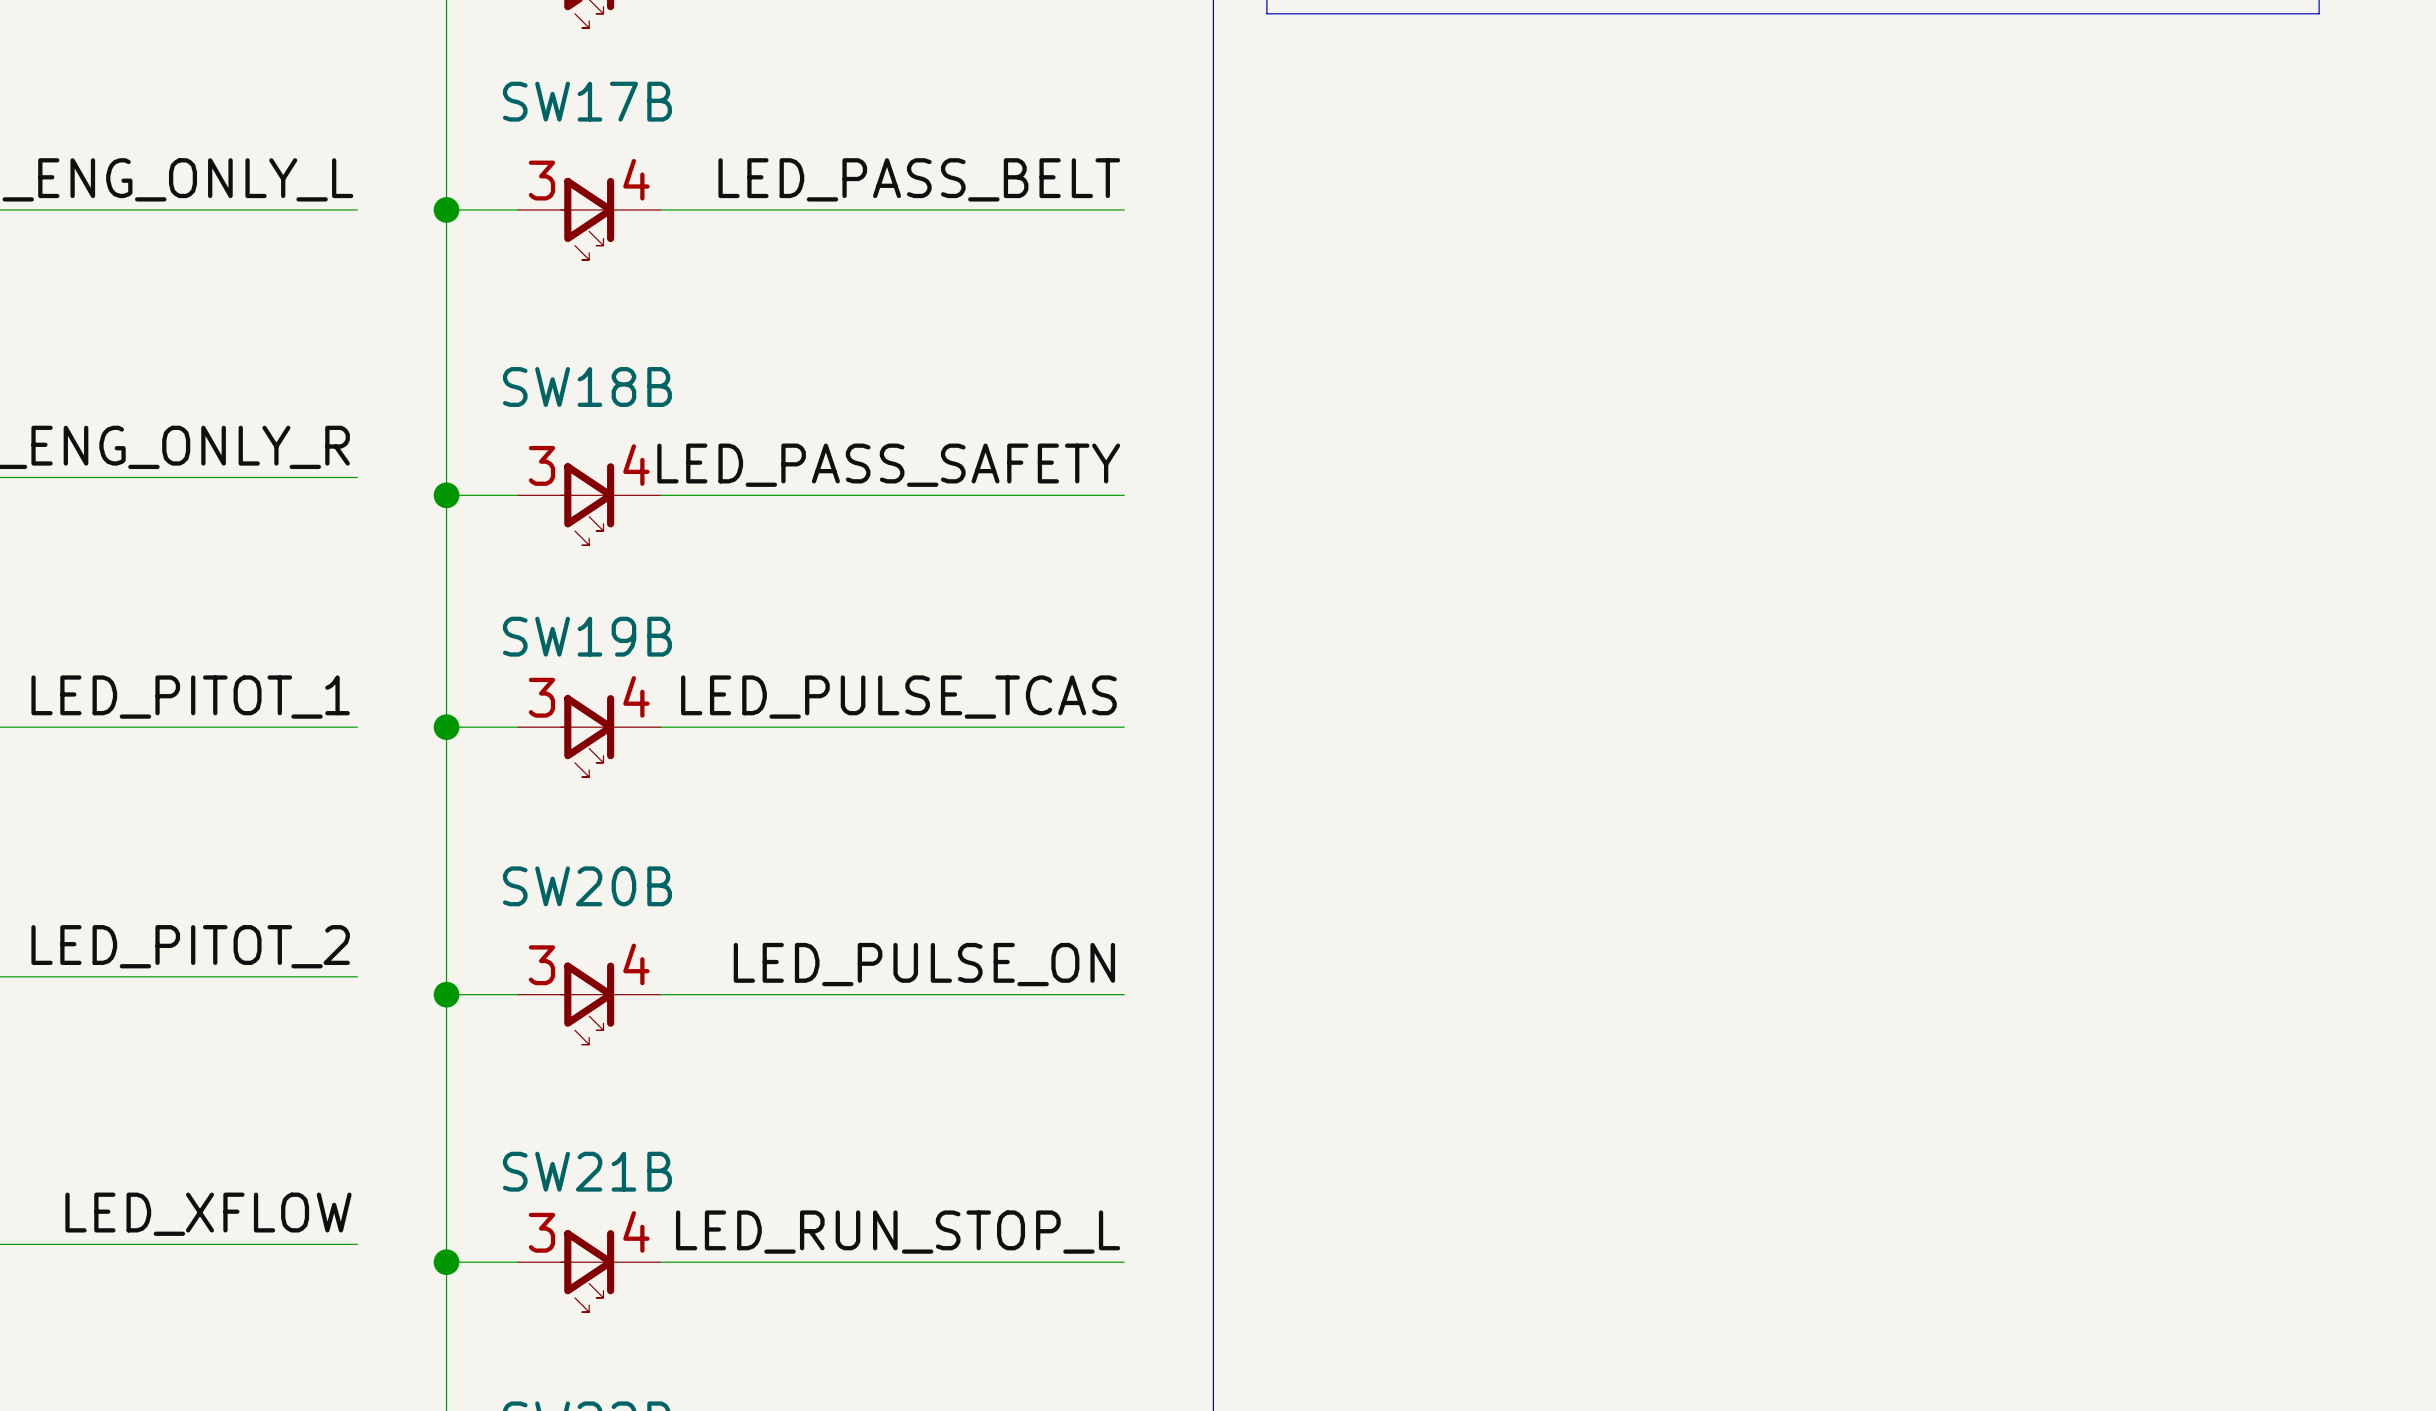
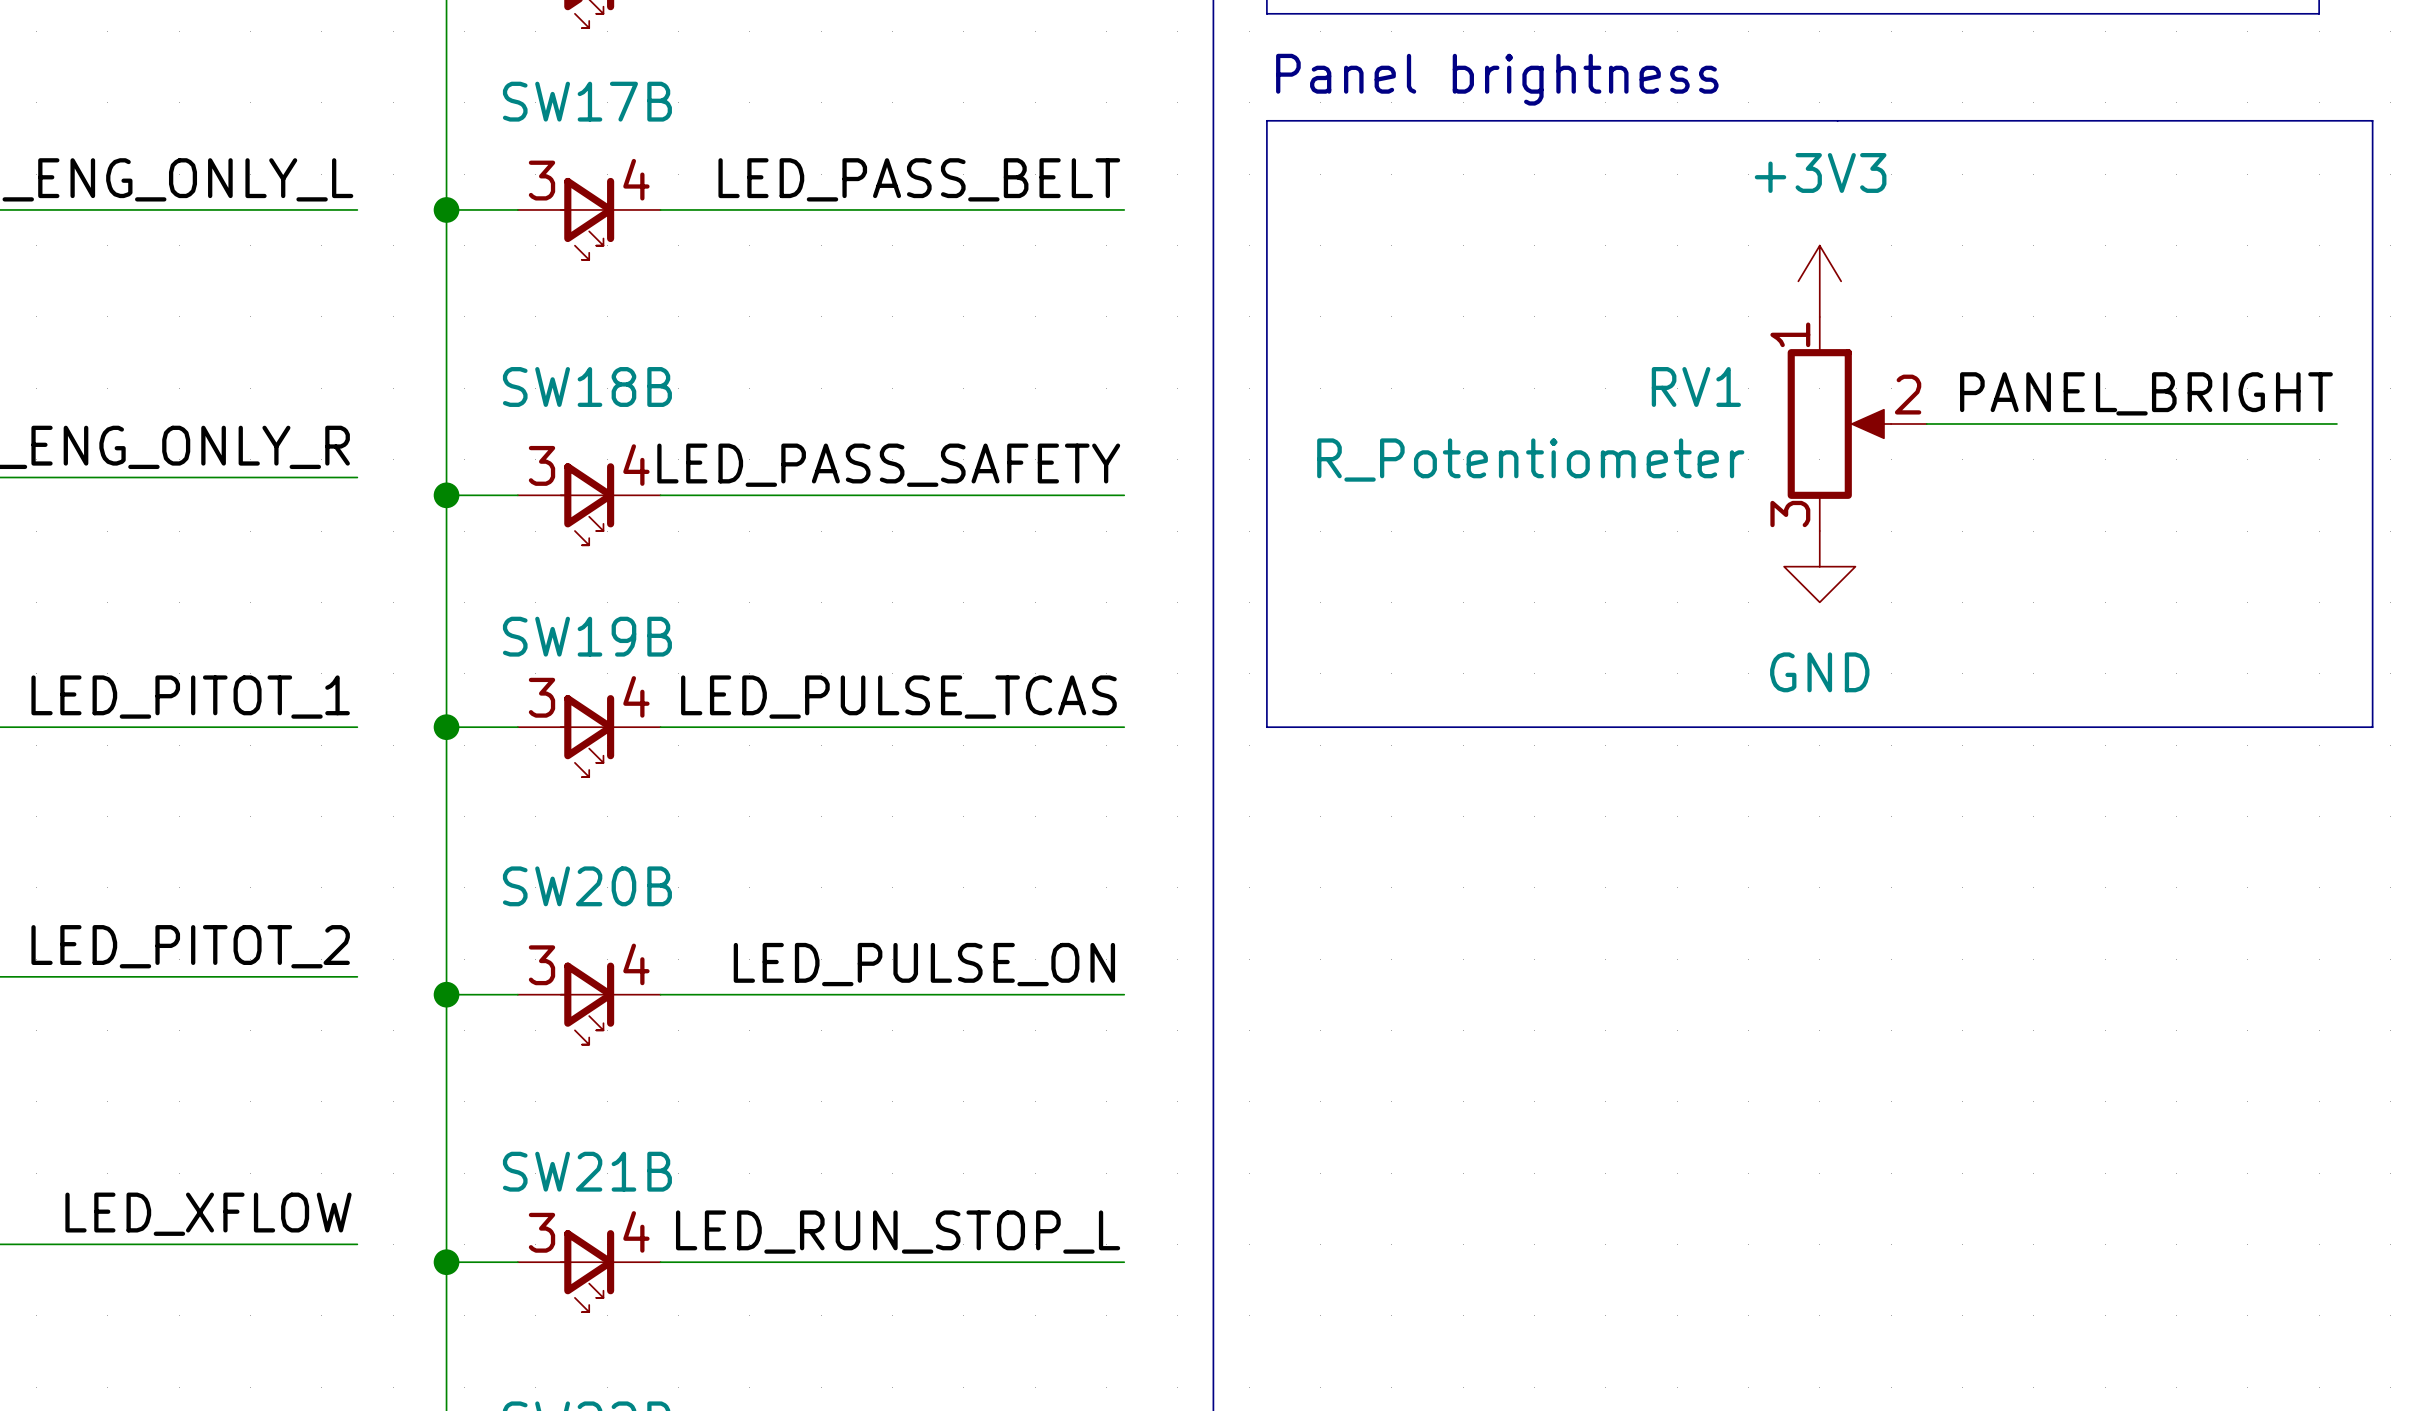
text: none -> Panel brightness (1497, 79)
line: none -> (1266, 120) (2372, 120) (2372, 727) (1266, 727) (1266, 120)
power symbol: none -> +3V3 (1819, 281)
label: none -> PANEL_BRIGHT (2146, 393)
RV1: none -> R_Potentiometer (1857, 423)
wire: none -> (1926, 423) (2336, 423)
power symbol: none -> GND (1819, 566)

